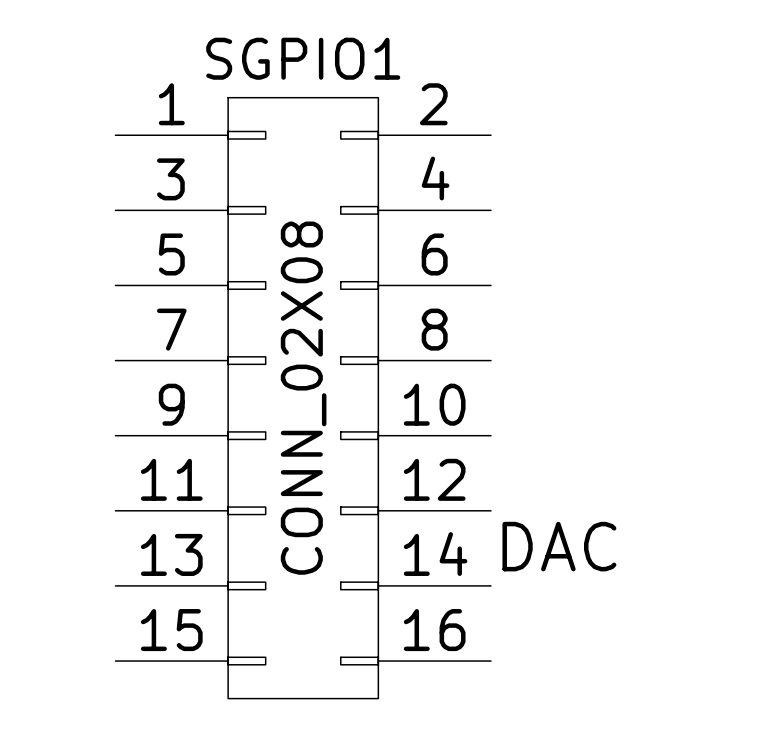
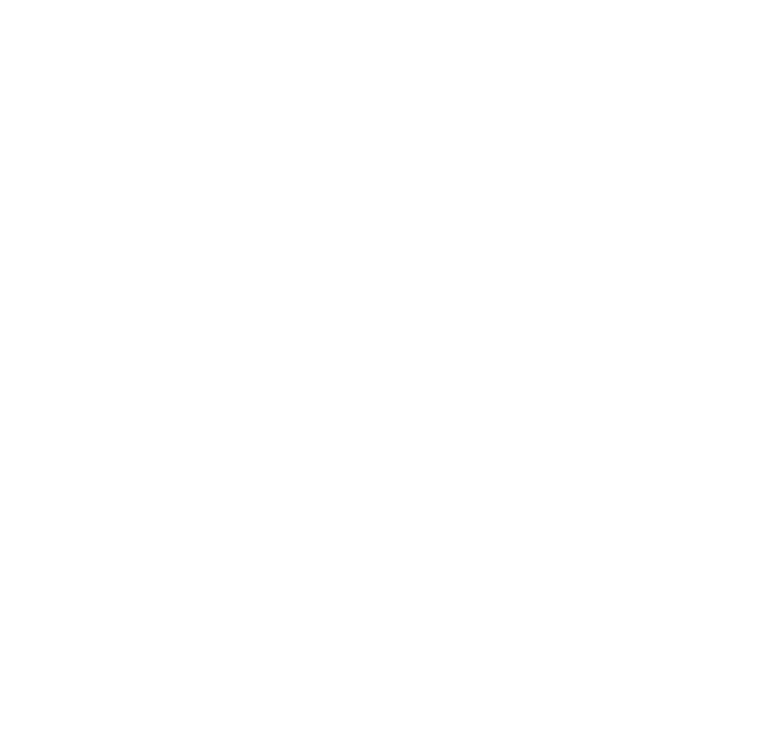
SGPIO1: CONN_02X08 (303, 398) -> none
label: DAC (559, 546) -> none

